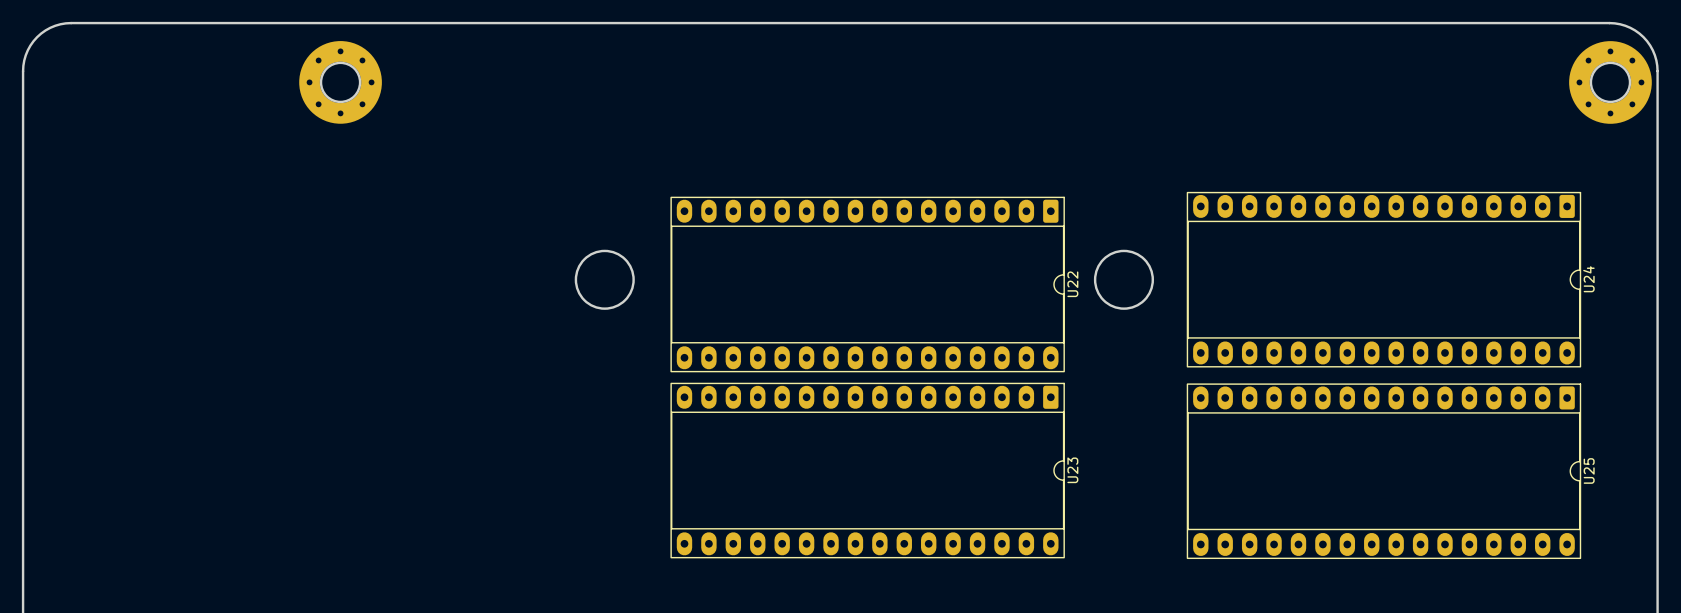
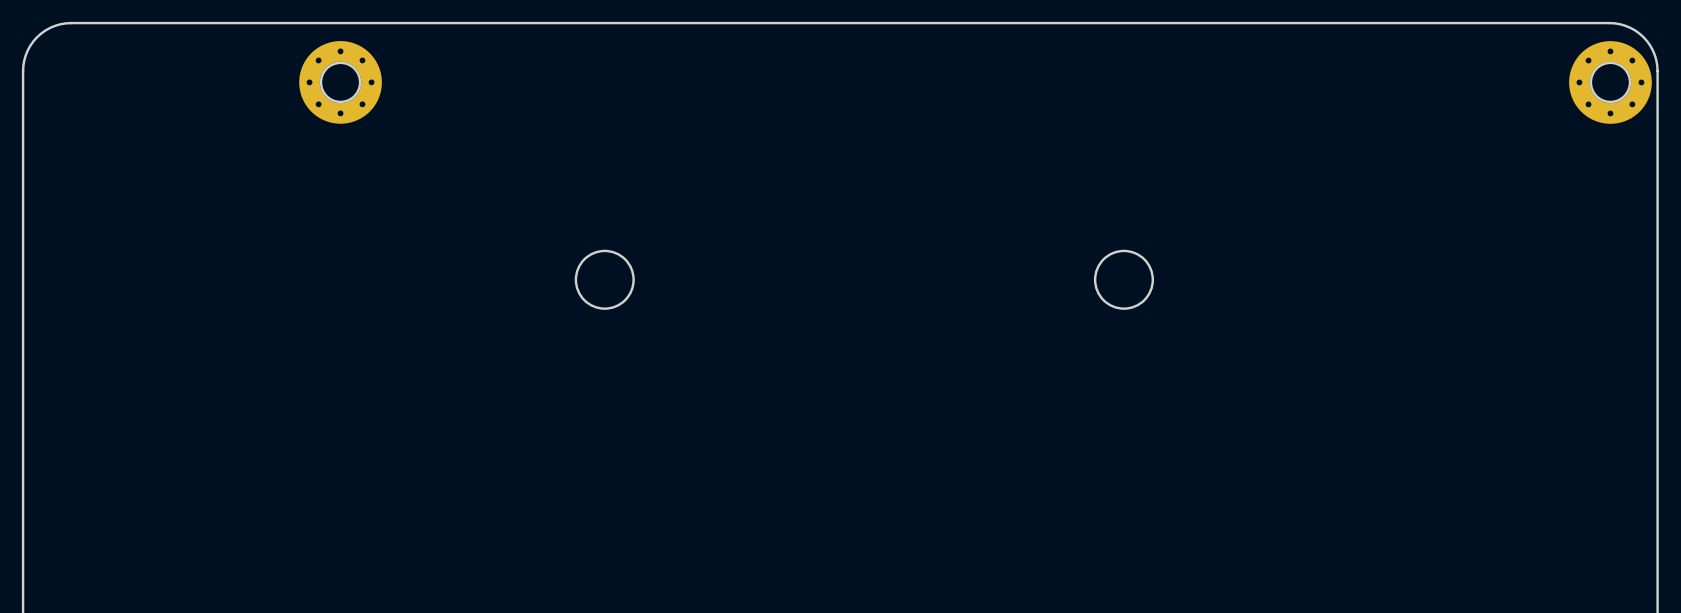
U24: (1383, 279) -> none
U22: (867, 284) -> none
U23: (867, 470) -> none
U25: (1383, 471) -> none

